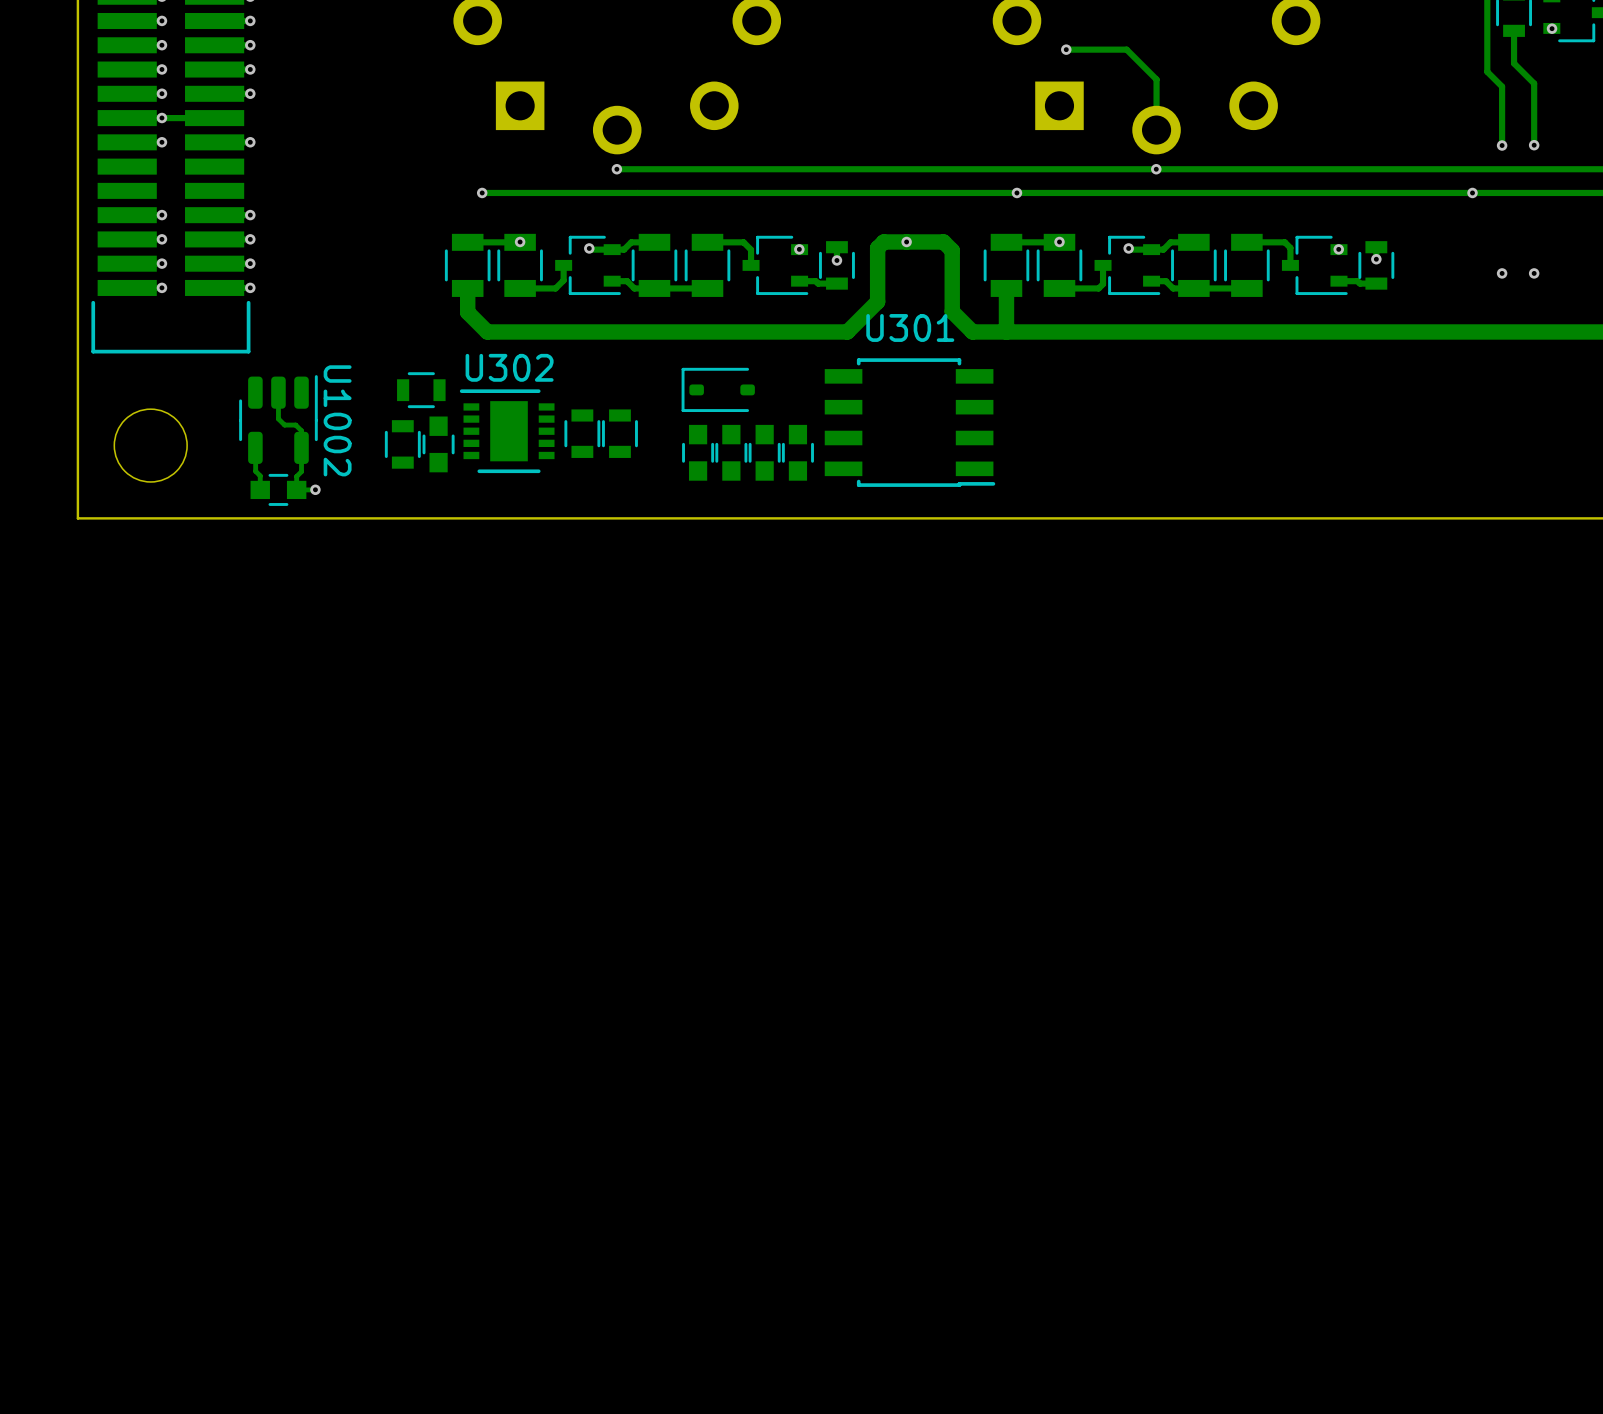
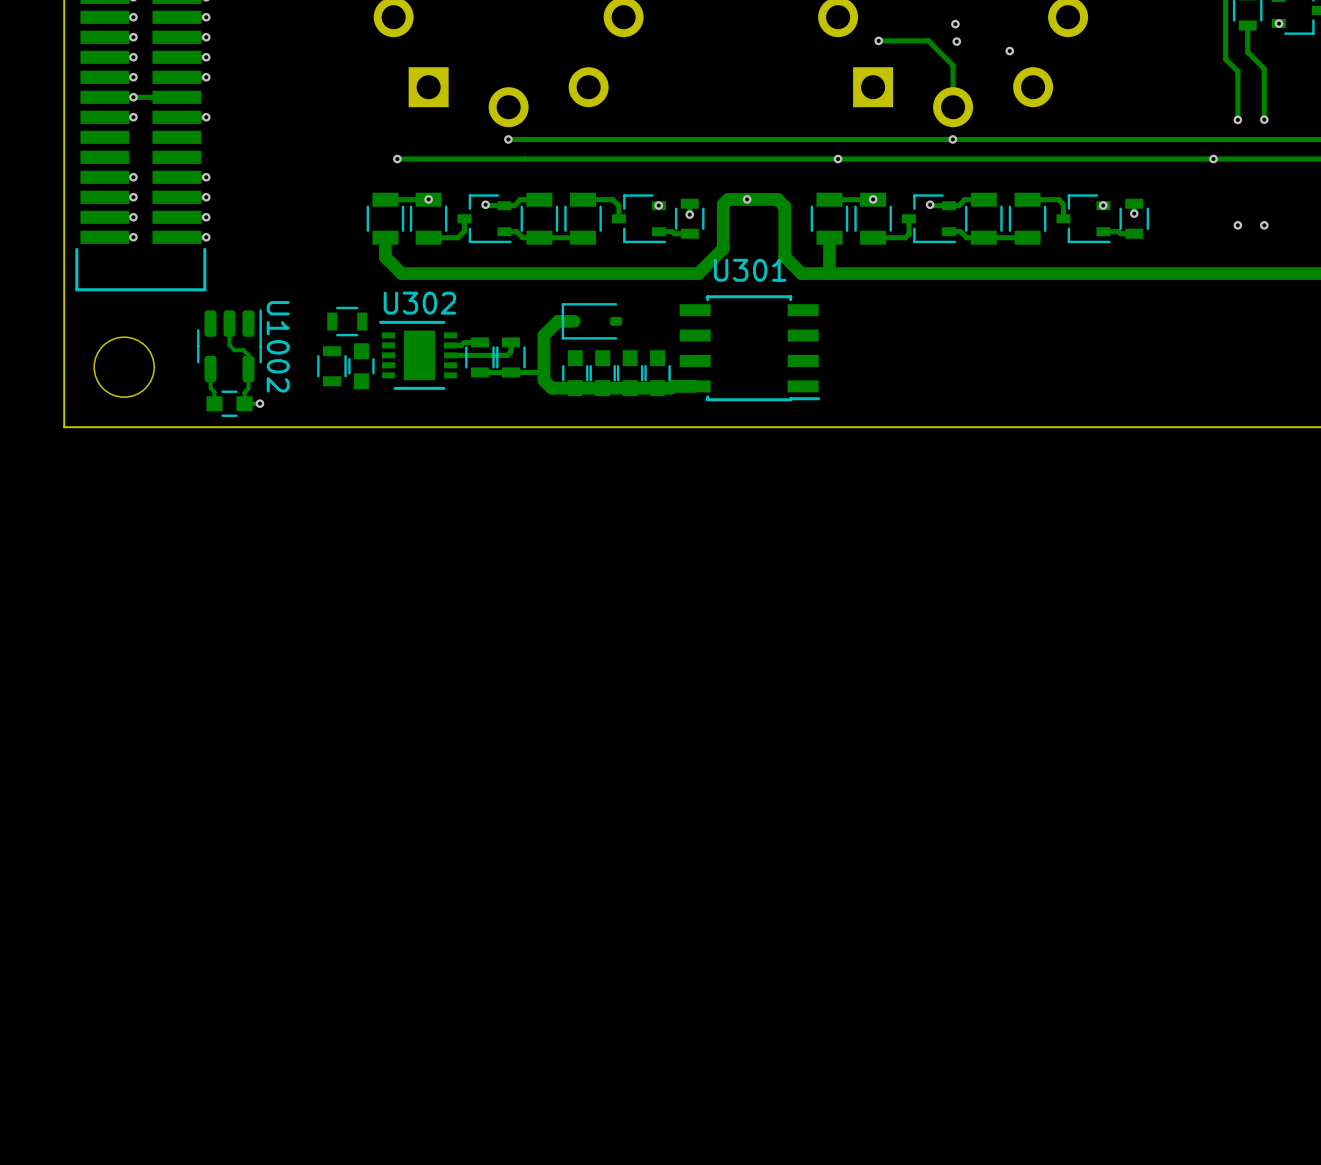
via: none -> (955, 24)
via: none -> (956, 41)
via: none -> (1009, 51)
track: none -> (574, 321) (558, 321) (543, 335) (543, 380) (551, 388) (695, 386)
track: none -> (479, 342) (464, 342) (461, 345) (450, 345)
track: none -> (510, 342) (510, 351) (507, 355) (450, 355)
track: none -> (543, 372) (479, 372)

